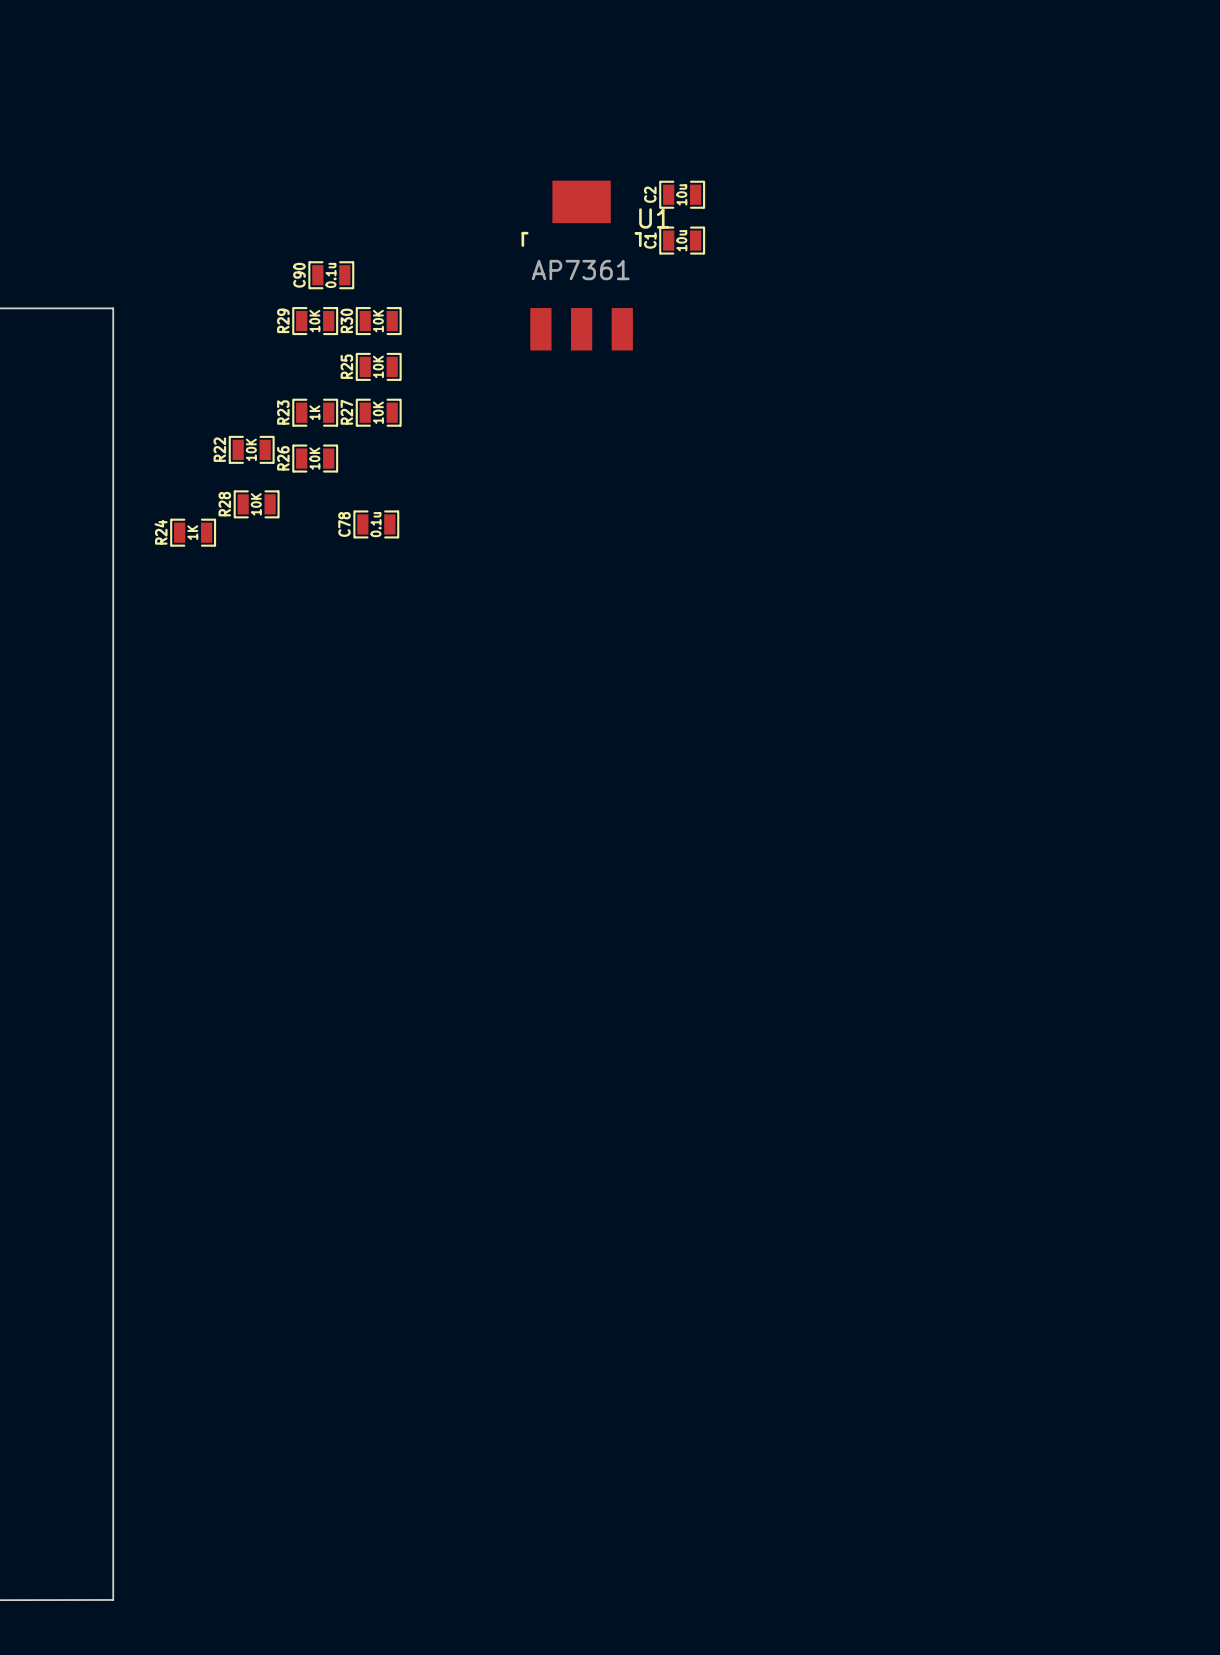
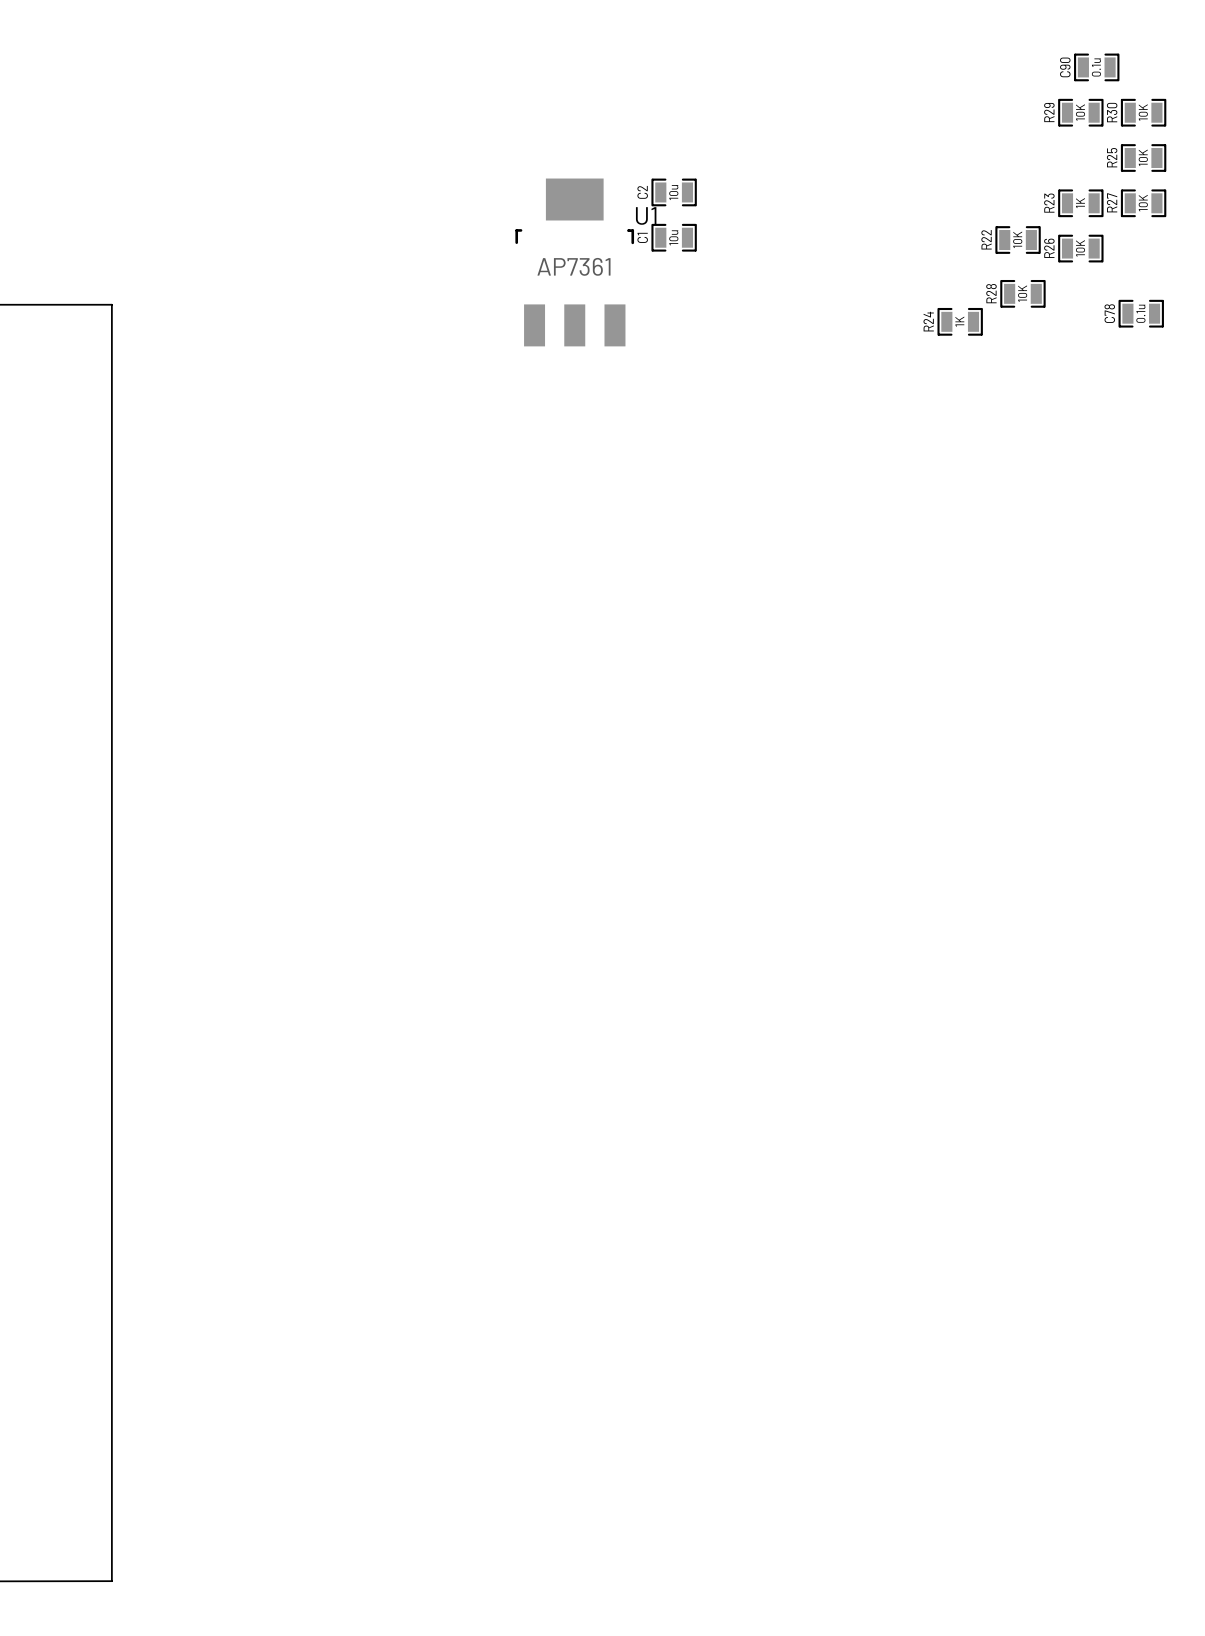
C90 position: (331, 275) -> (1096, 67)
R29 position: (315, 321) -> (1080, 112)
R30 position: (378, 321) -> (1143, 112)
R25 position: (378, 366) -> (1143, 158)
R23 position: (315, 412) -> (1080, 203)
R27 position: (378, 412) -> (1143, 203)
R22 position: (251, 449) -> (1018, 240)
R26 position: (315, 458) -> (1080, 248)
R28 position: (256, 504) -> (1022, 293)
C78 position: (376, 524) -> (1141, 313)
R24 position: (193, 532) -> (960, 321)

